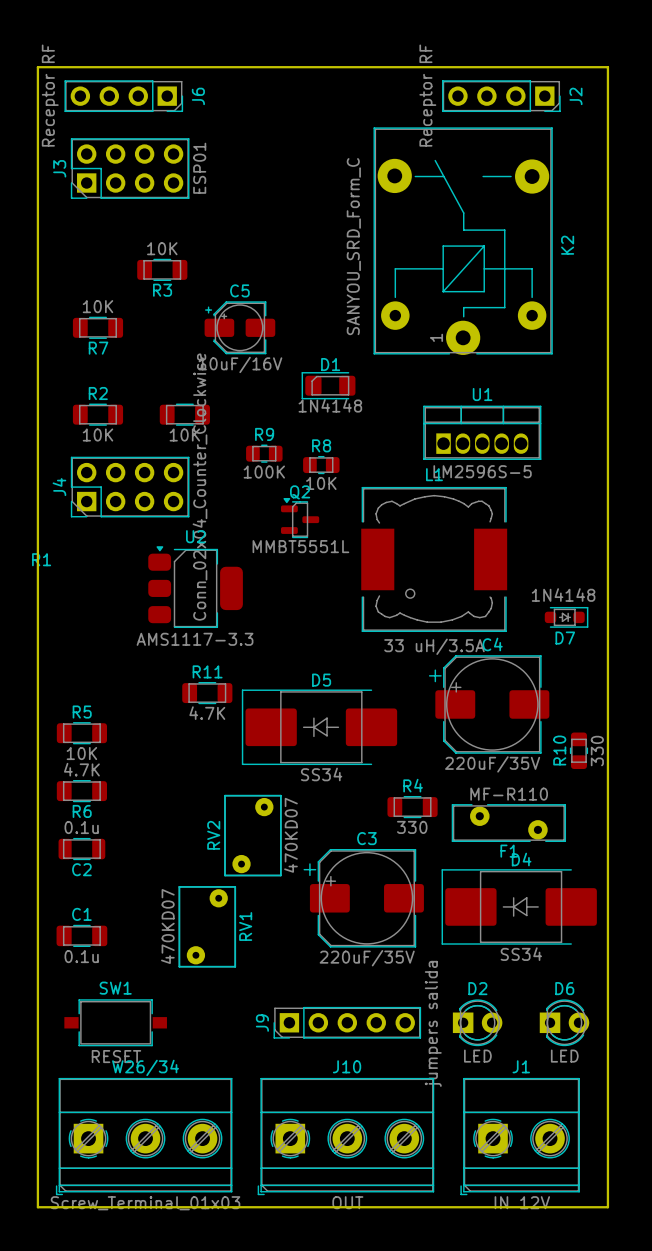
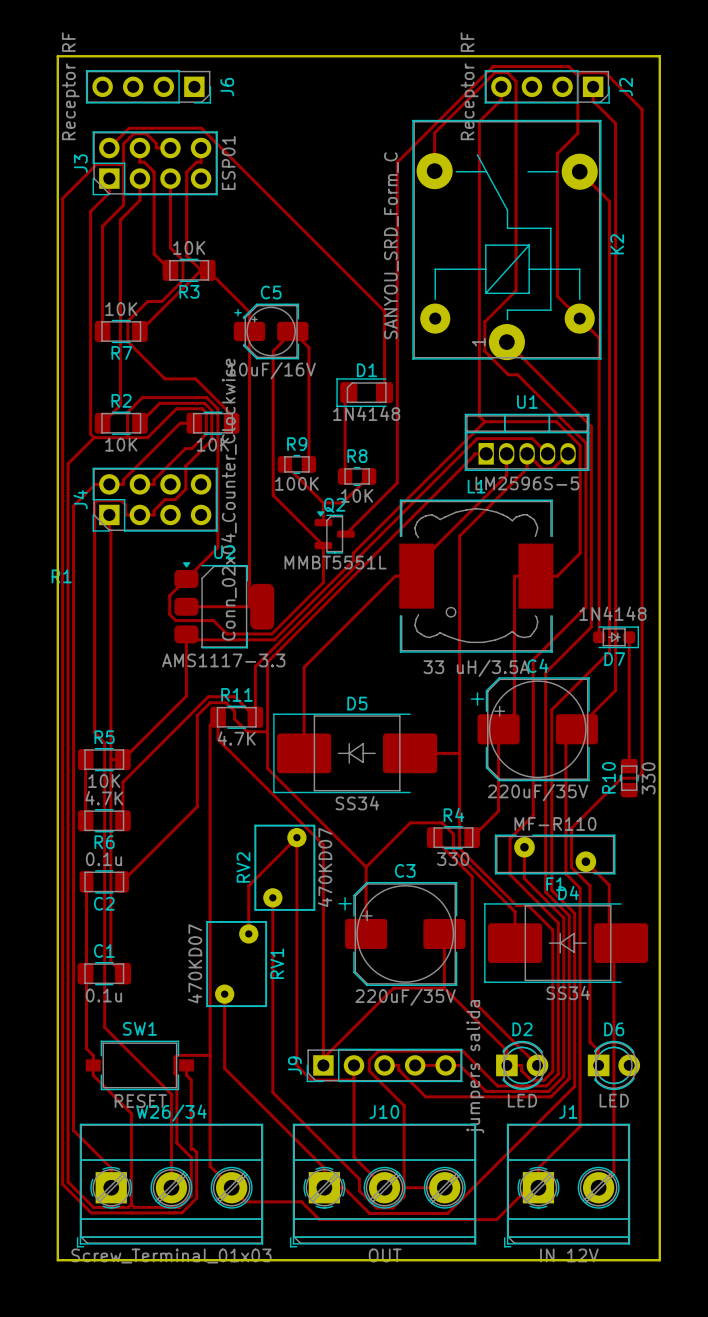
track: none -> (577, 75) (577, 133) (557, 153) (557, 296) (599, 337) (599, 637)
track: none -> (577, 75) (568, 66) (493, 66) (397, 162) (397, 482) (345, 534)
track: none -> (577, 75) (580, 72) (605, 72) (642, 109) (642, 773) (636, 778) (621, 778) (571, 828) (571, 867) (589, 885) (589, 1042) (598, 1050) (598, 1065)
track: none -> (501, 86) (501, 99) (479, 121) (479, 416) (484, 421)
track: none -> (593, 86) (593, 101) (615, 123) (615, 690) (565, 740) (565, 873) (580, 888) (580, 1126) (538, 1168) (538, 1187)
track: none -> (109, 148) (129, 128) (201, 128) (384, 311) (384, 392)
track: none -> (139, 148) (139, 162) (144, 162) (154, 171) (154, 253) (170, 270)
track: none -> (170, 148) (156, 148) (156, 143) (146, 133) (133, 133) (123, 144) (123, 205) (102, 226) (102, 331)
track: none -> (201, 148) (201, 162) (196, 162) (186, 172) (186, 255) (201, 270)
track: none -> (123, 164) (96, 164) (62, 198) (62, 1184) (91, 1212) (174, 1212)
track: none -> (434, 171) (434, 132) (495, 72) (507, 72) (516, 81) (516, 290) (484, 322) (484, 351) (508, 374) (517, 374) (585, 443) (585, 607) (533, 659) (533, 815) (509, 838) (509, 874) (558, 922) (558, 1074) (546, 1085) (497, 1085) (462, 1051) (378, 1051) (369, 1060) (369, 1070) (404, 1105) (404, 1196) (392, 1207) (376, 1207) (359, 1190) (359, 1179) (272, 1092) (272, 897)
track: none -> (579, 171) (609, 201) (609, 652) (551, 709) (551, 890) (574, 913) (574, 1086) (447, 1213) (369, 1213) (343, 1187) (324, 1187) (324, 1168) (224, 1068) (224, 994)
track: none -> (109, 178) (109, 192) (90, 211) (90, 434) (94, 437)
track: none -> (139, 178) (139, 200) (120, 219) (120, 405) (102, 423)
track: none -> (170, 178) (170, 247) (182, 260) (182, 280) (161, 301) (147, 301) (127, 321) (127, 341) (164, 378) (195, 378) (231, 414) (231, 423)
track: none -> (201, 270) (139, 331)
track: none -> (201, 270) (207, 270) (249, 311) (249, 606)
track: none -> (506, 342) (591, 426) (591, 627) (545, 672) (545, 892) (569, 915) (569, 1078) (550, 1096) (425, 1096) (398, 1069) (398, 1065) (384, 1065)
track: none -> (348, 392) (345, 396) (345, 476)
track: none -> (484, 421) (353, 553) (353, 560) (274, 639) (191, 639) (186, 634) (186, 696) (122, 759) (110, 759)
track: none -> (484, 421) (556, 421) (580, 445) (580, 553) (557, 576) (514, 576) (514, 713) (498, 729) (498, 811) (472, 837)
track: none -> (139, 423) (159, 403) (204, 403) (211, 410) (211, 440) (185, 466) (185, 489) (175, 499) (164, 499) (154, 510) (154, 514) (125, 514) (125, 504) (121, 500) (97, 500) (94, 503) (94, 732) (104, 742) (104, 1027) (171, 1094) (171, 1187)
track: none -> (194, 423) (180, 423) (123, 479) (123, 484) (95, 484) (73, 506) (73, 1130) (111, 1168) (111, 1187)
track: none -> (94, 437) (147, 437) (176, 408) (202, 408) (206, 412) (206, 434) (191, 448) (185, 448) (154, 479) (154, 484) (139, 484)
track: none -> (94, 437) (68, 463) (68, 1182) (93, 1207) (128, 1207) (131, 1204)
track: none -> (127, 437) (127, 412) (142, 397) (206, 397) (217, 408) (217, 547) (169, 595) (169, 614) (175, 620) (213, 620) (226, 633) (271, 633) (323, 582) (323, 545) (273, 495) (273, 351) (292, 331) (308, 347) (308, 464)
track: none -> (486, 453) (474, 453) (267, 662) (267, 768) (366, 867)
track: none -> (506, 453) (506, 475) (406, 576)
track: none -> (547, 453) (532, 438) (477, 438) (358, 557) (358, 563) (255, 666) (255, 717) (234, 696) (208, 696) (122, 782) (122, 820)
track: none -> (568, 453) (553, 468) (542, 468) (527, 453) (527, 468) (459, 536) (459, 848) (516, 905) (528, 905) (552, 930) (552, 1071) (543, 1080) (531, 1080) (521, 1070) (521, 1065) (506, 1065) (506, 1050) (444, 988)
track: none -> (284, 464) (323, 502)
track: none -> (369, 476) (342, 502) (323, 502)
track: none -> (323, 502) (323, 522)
track: none -> (109, 514) (110, 530) (110, 961) (123, 973)
track: none -> (416, 576) (395, 576) (304, 667) (304, 753)
track: none -> (186, 606) (262, 606)
track: none -> (629, 637) (629, 766)
track: none -> (267, 731) (247, 731) (234, 719) (234, 711) (225, 702) (210, 702) (197, 715) (197, 806) (122, 881)
track: none -> (410, 753) (459, 753)
track: none -> (85, 759) (85, 820)
track: none -> (434, 837) (472, 876) (472, 1000) (537, 1065)
track: none -> (524, 847) (524, 878) (563, 917) (563, 1076) (548, 1091) (485, 1091) (459, 1065) (415, 1065)
track: none -> (585, 861) (609, 885) (609, 931) (621, 943)
track: none -> (366, 867) (366, 933)
track: none -> (366, 867) (410, 822) (442, 822) (453, 834) (453, 850) (515, 911) (515, 943)
track: none -> (86, 881) (86, 1048) (93, 1055) (93, 1075) (131, 1113) (131, 1204)
track: none -> (248, 933) (248, 885) (296, 837) (296, 1065) (311, 1080) (353, 1080)
track: none -> (444, 933) (444, 988)
track: none -> (613, 935) (613, 1172) (598, 1187)
track: none -> (444, 988) (393, 988) (323, 1058)
track: none -> (210, 1055) (177, 1055) (174, 1057) (174, 1073) (176, 1075) (176, 1143) (191, 1157) (191, 1195) (179, 1207) (134, 1207) (131, 1204)
track: none -> (186, 1065) (186, 1075) (191, 1080) (191, 1149) (196, 1152) (196, 1198) (181, 1212) (174, 1212)
track: none -> (323, 1065) (323, 844) (218, 739) (218, 717) (210, 725) (210, 1166) (245, 1201) (301, 1201) (319, 1219) (496, 1219) (538, 1177)
track: none -> (353, 1065) (353, 1157) (384, 1187)
track: none -> (404, 1187) (444, 1187)

